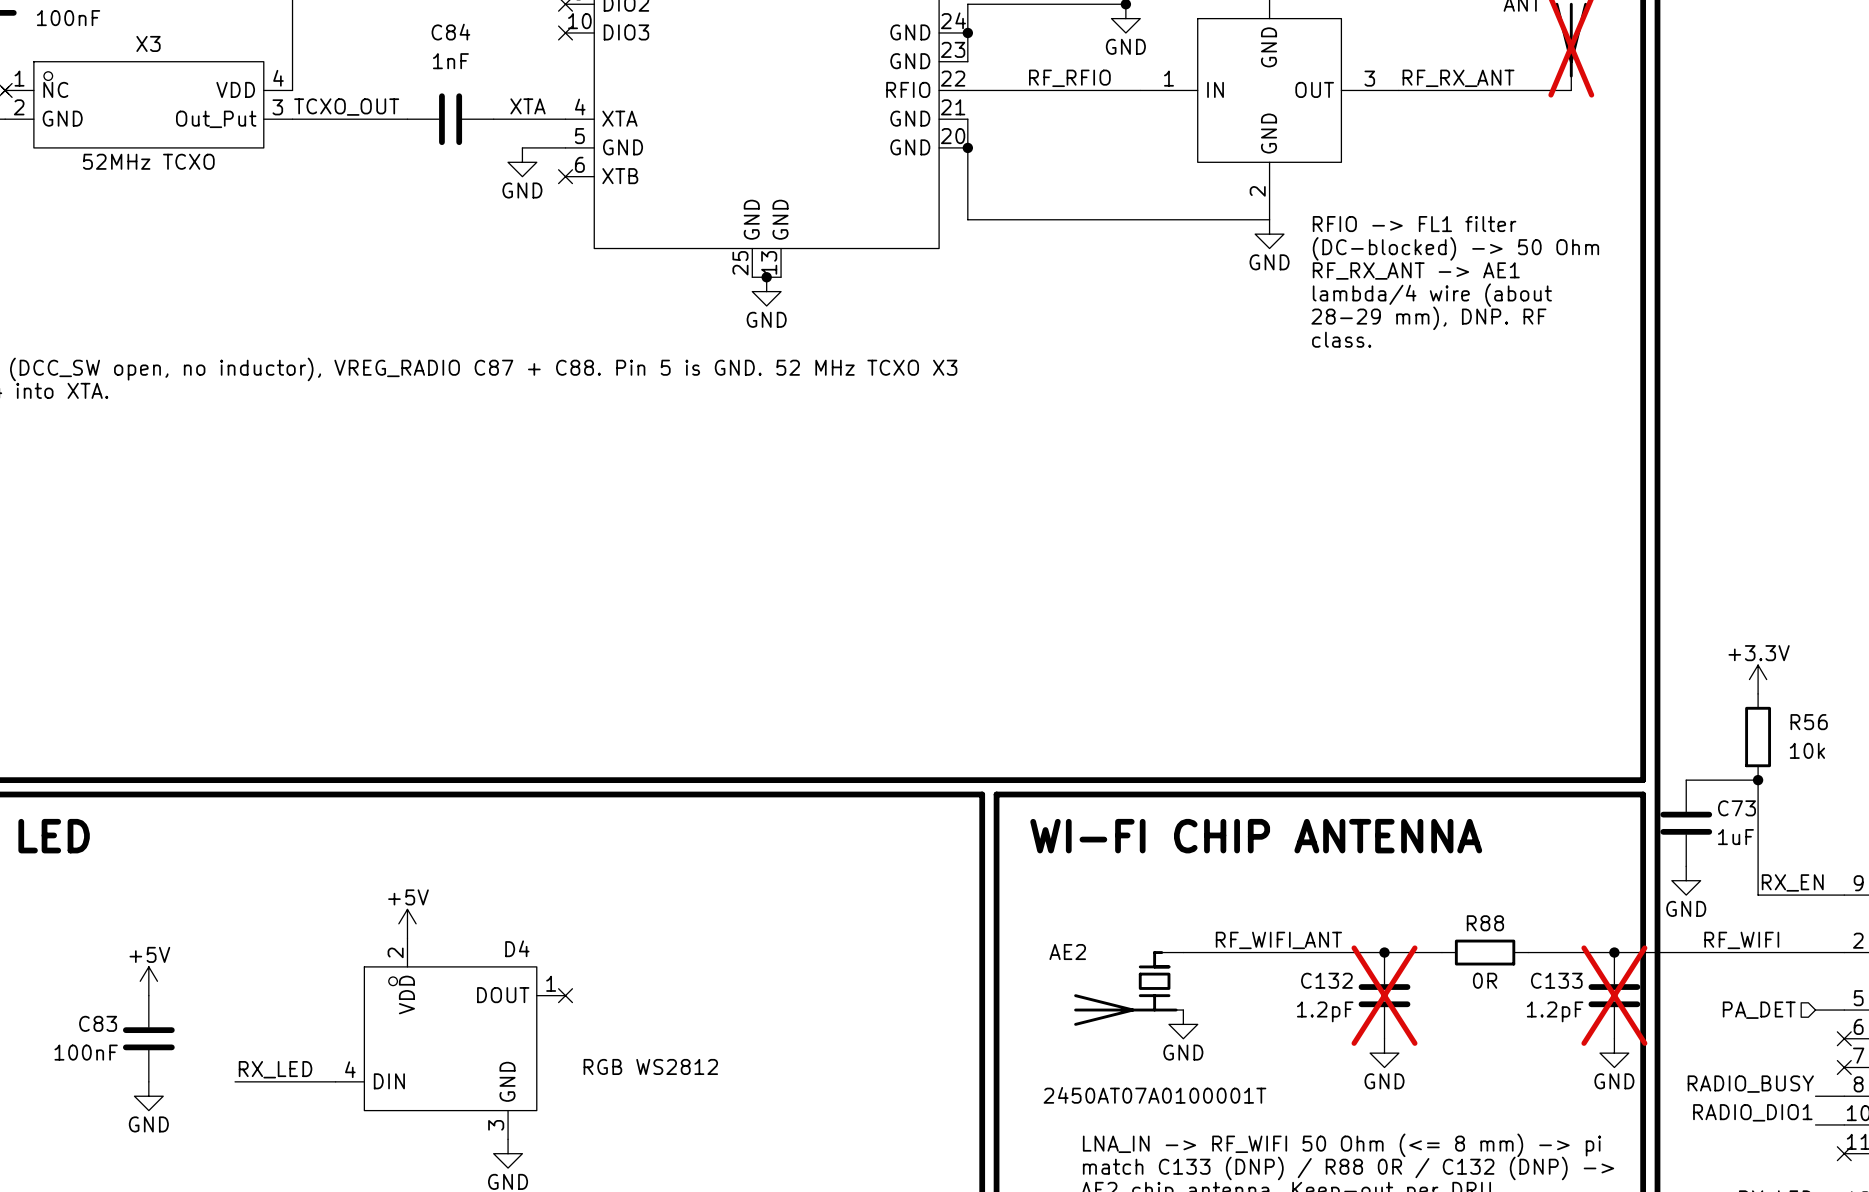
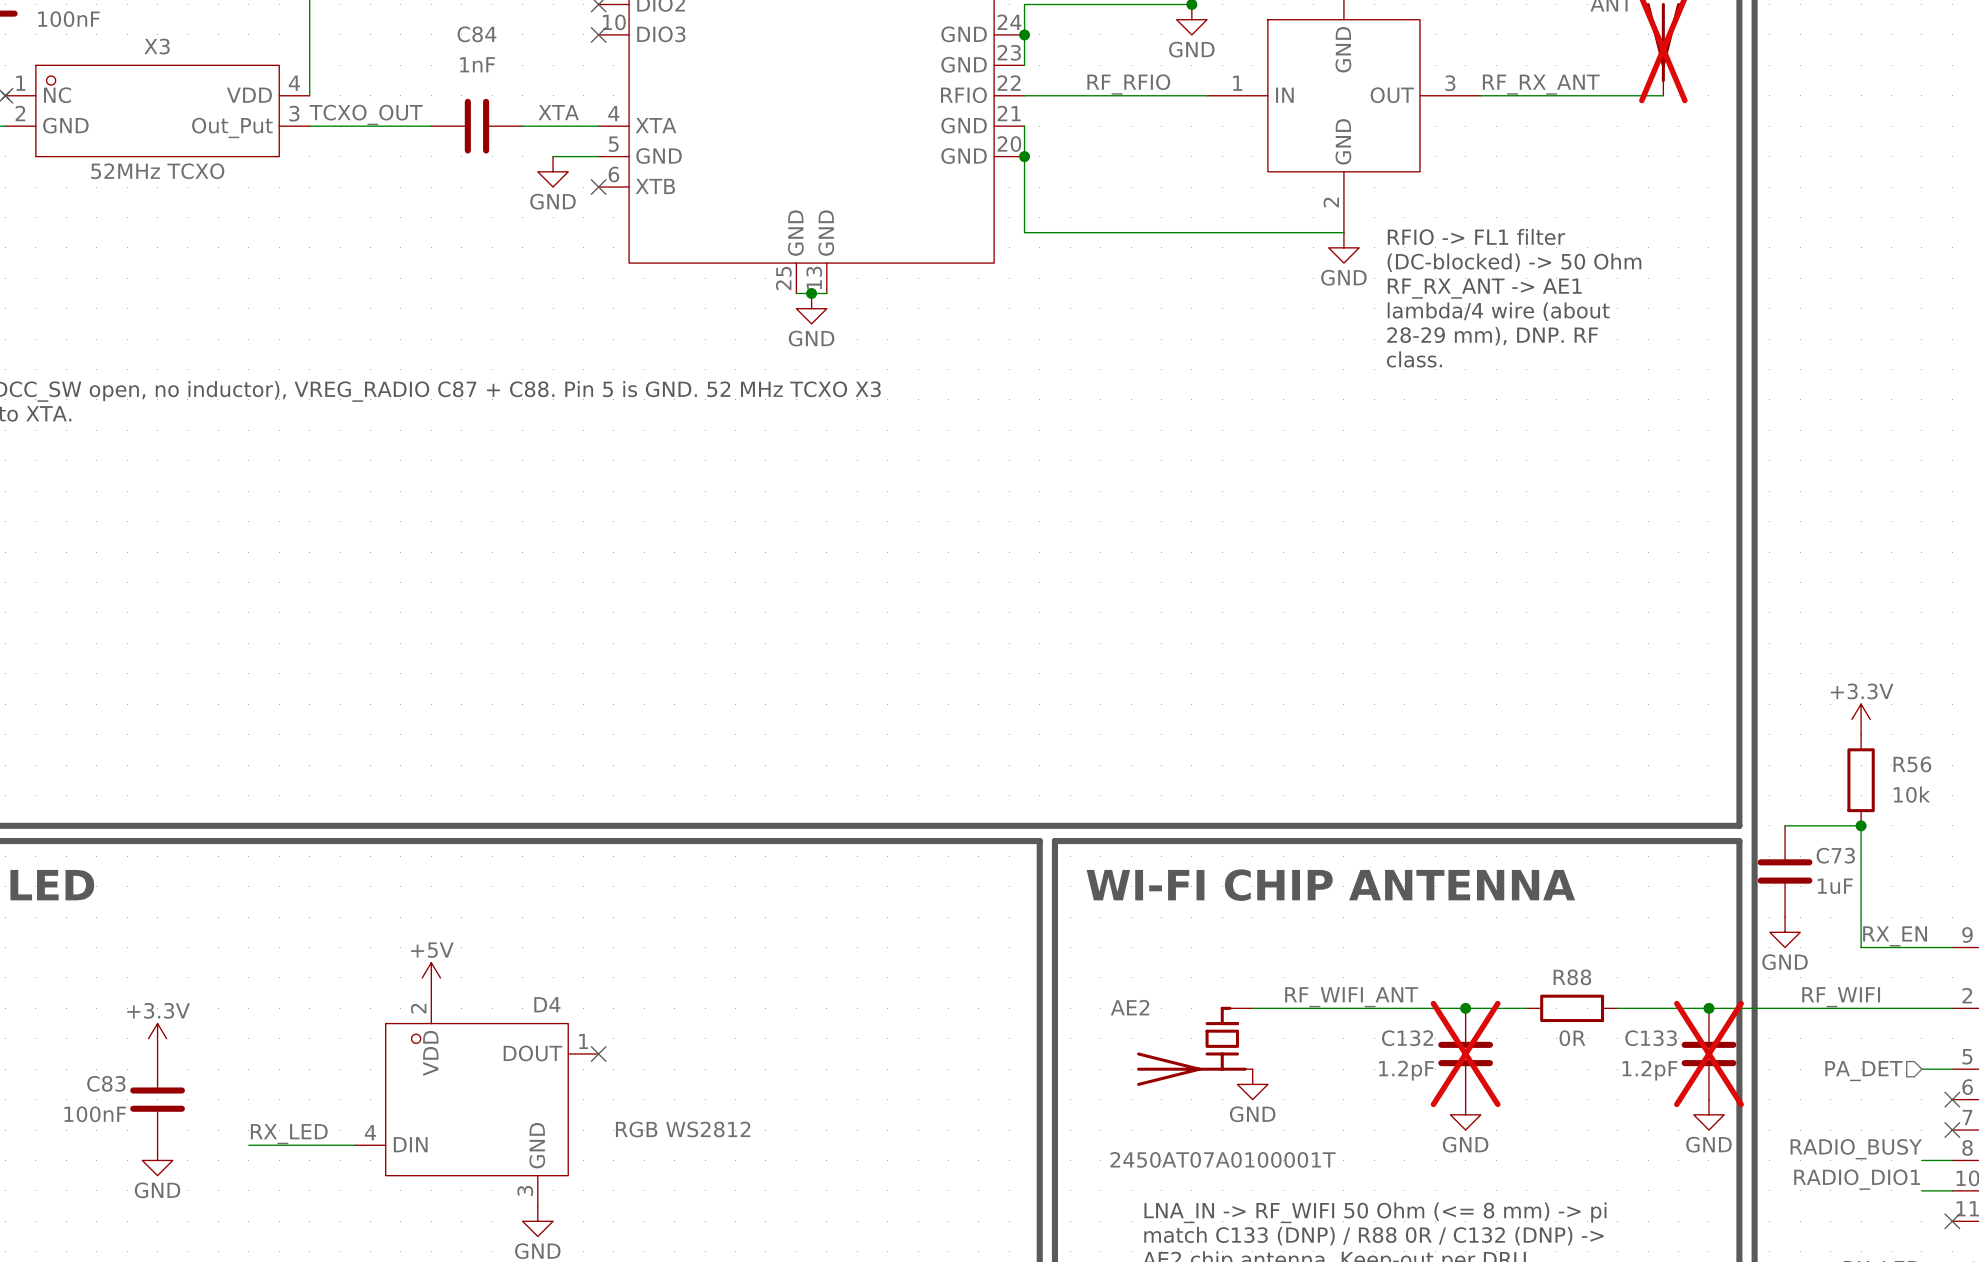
power symbol: +5V (148, 981) -> +3.3V (157, 1038)

